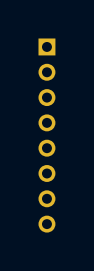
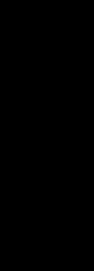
part: (46, 135) -> none

